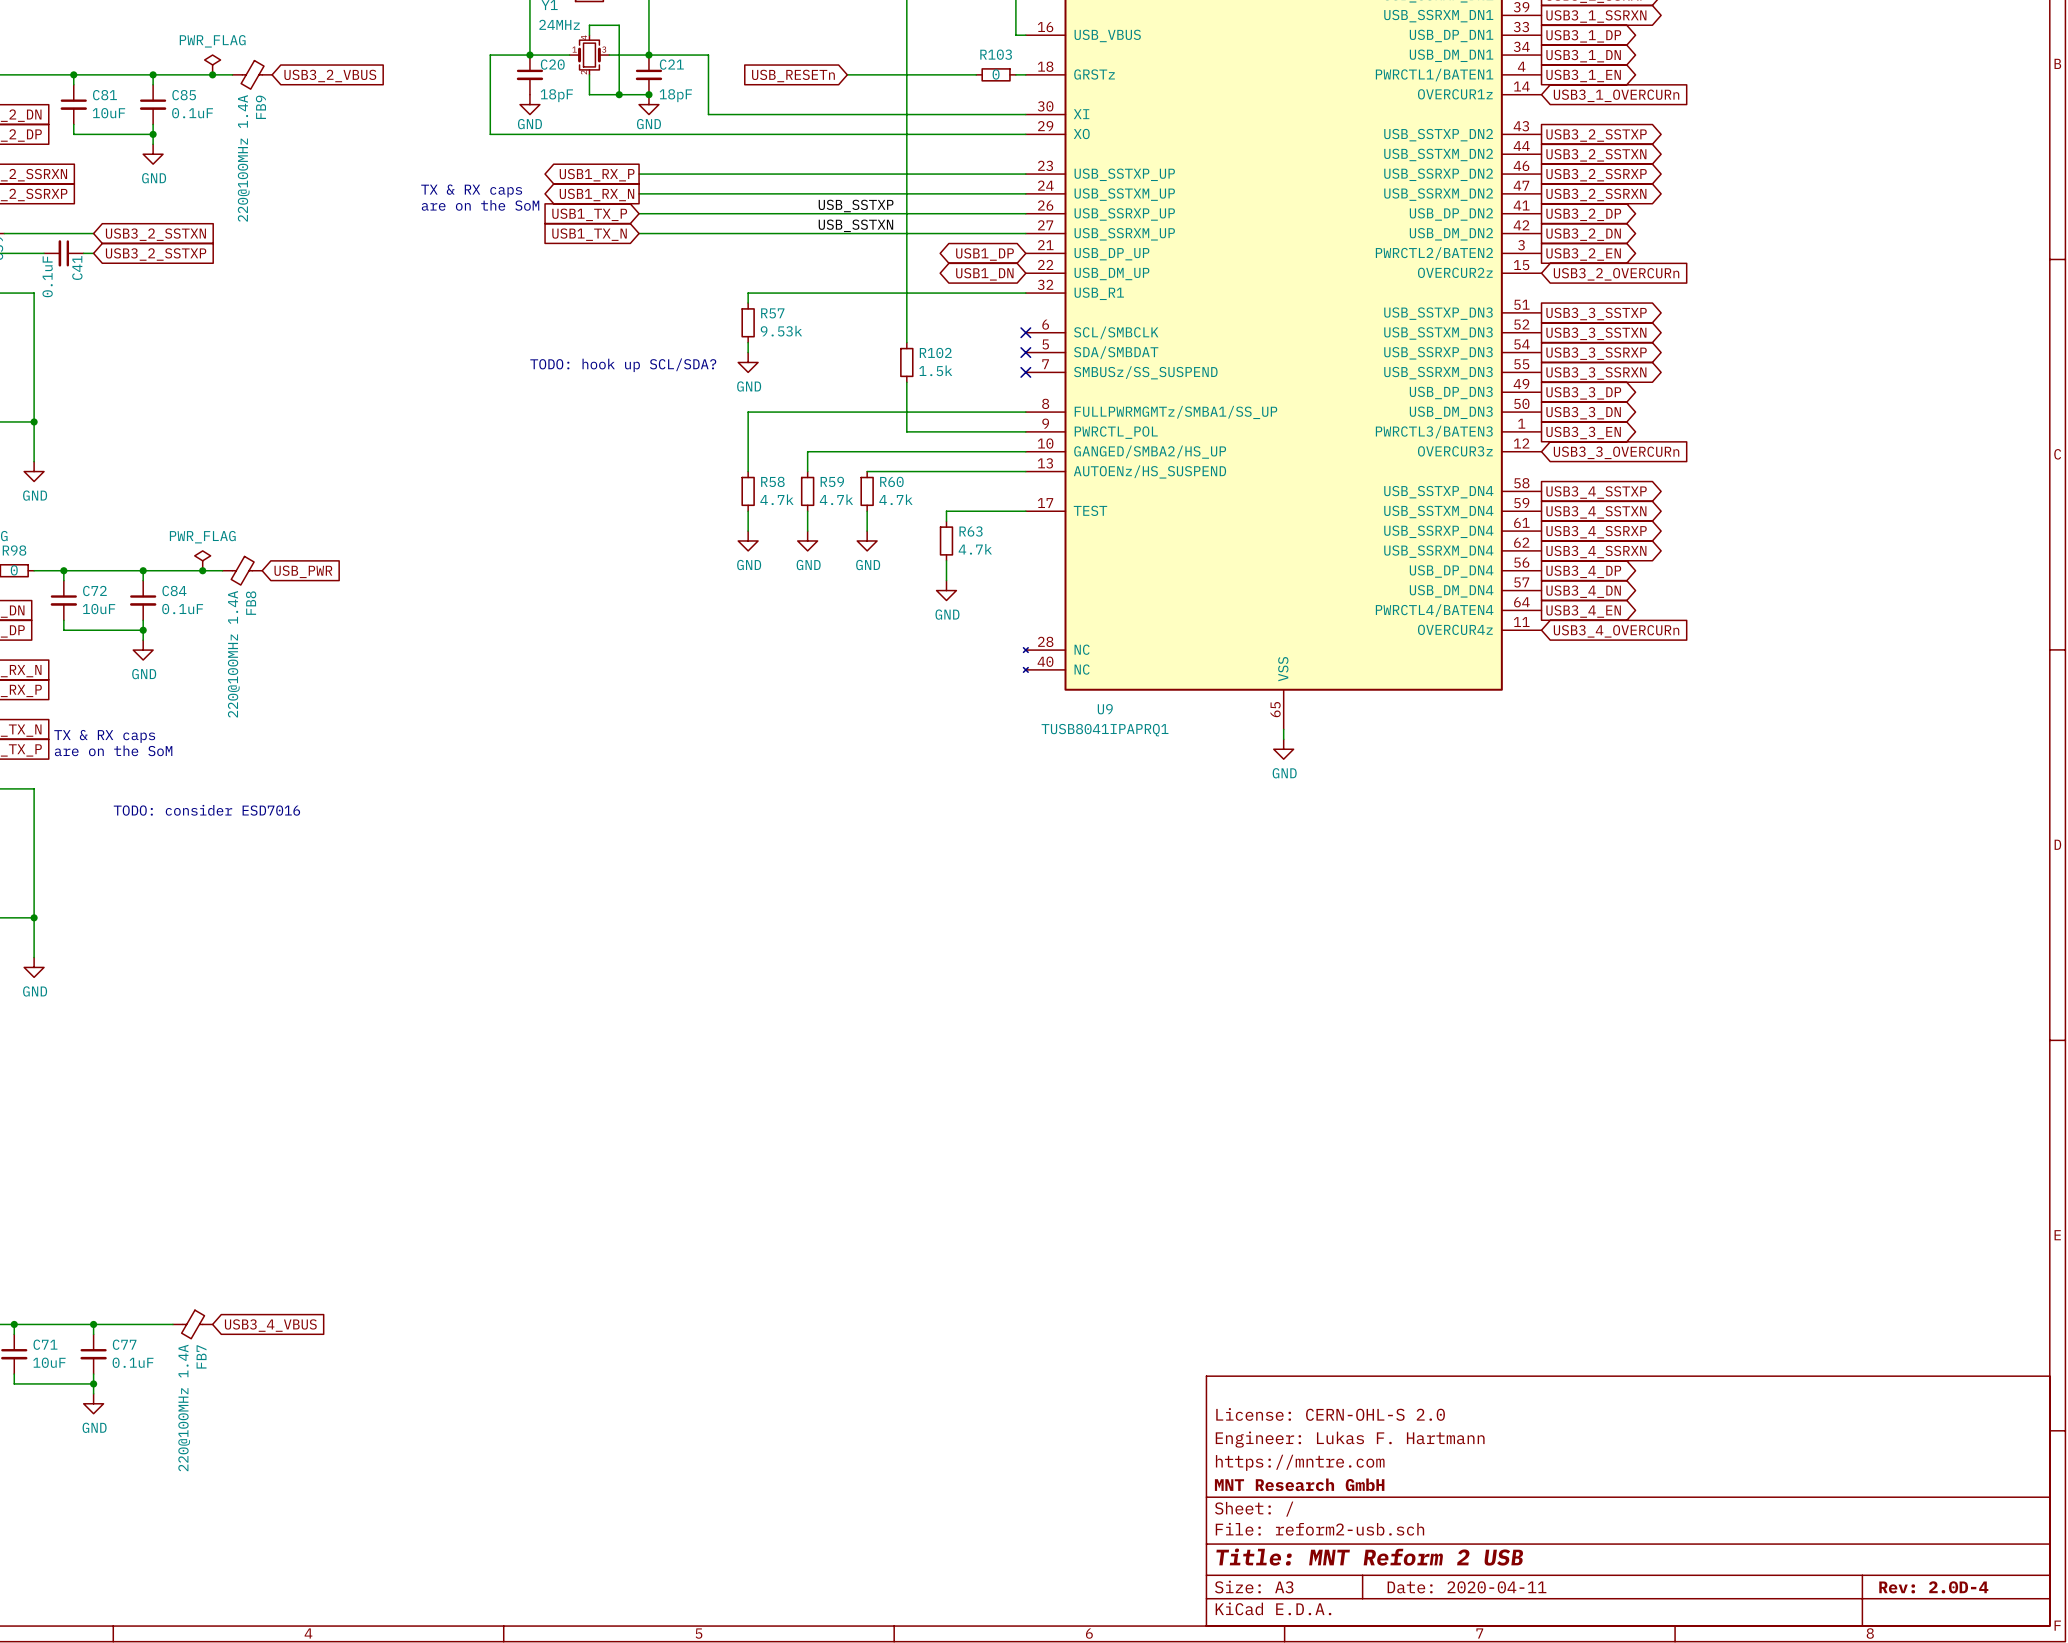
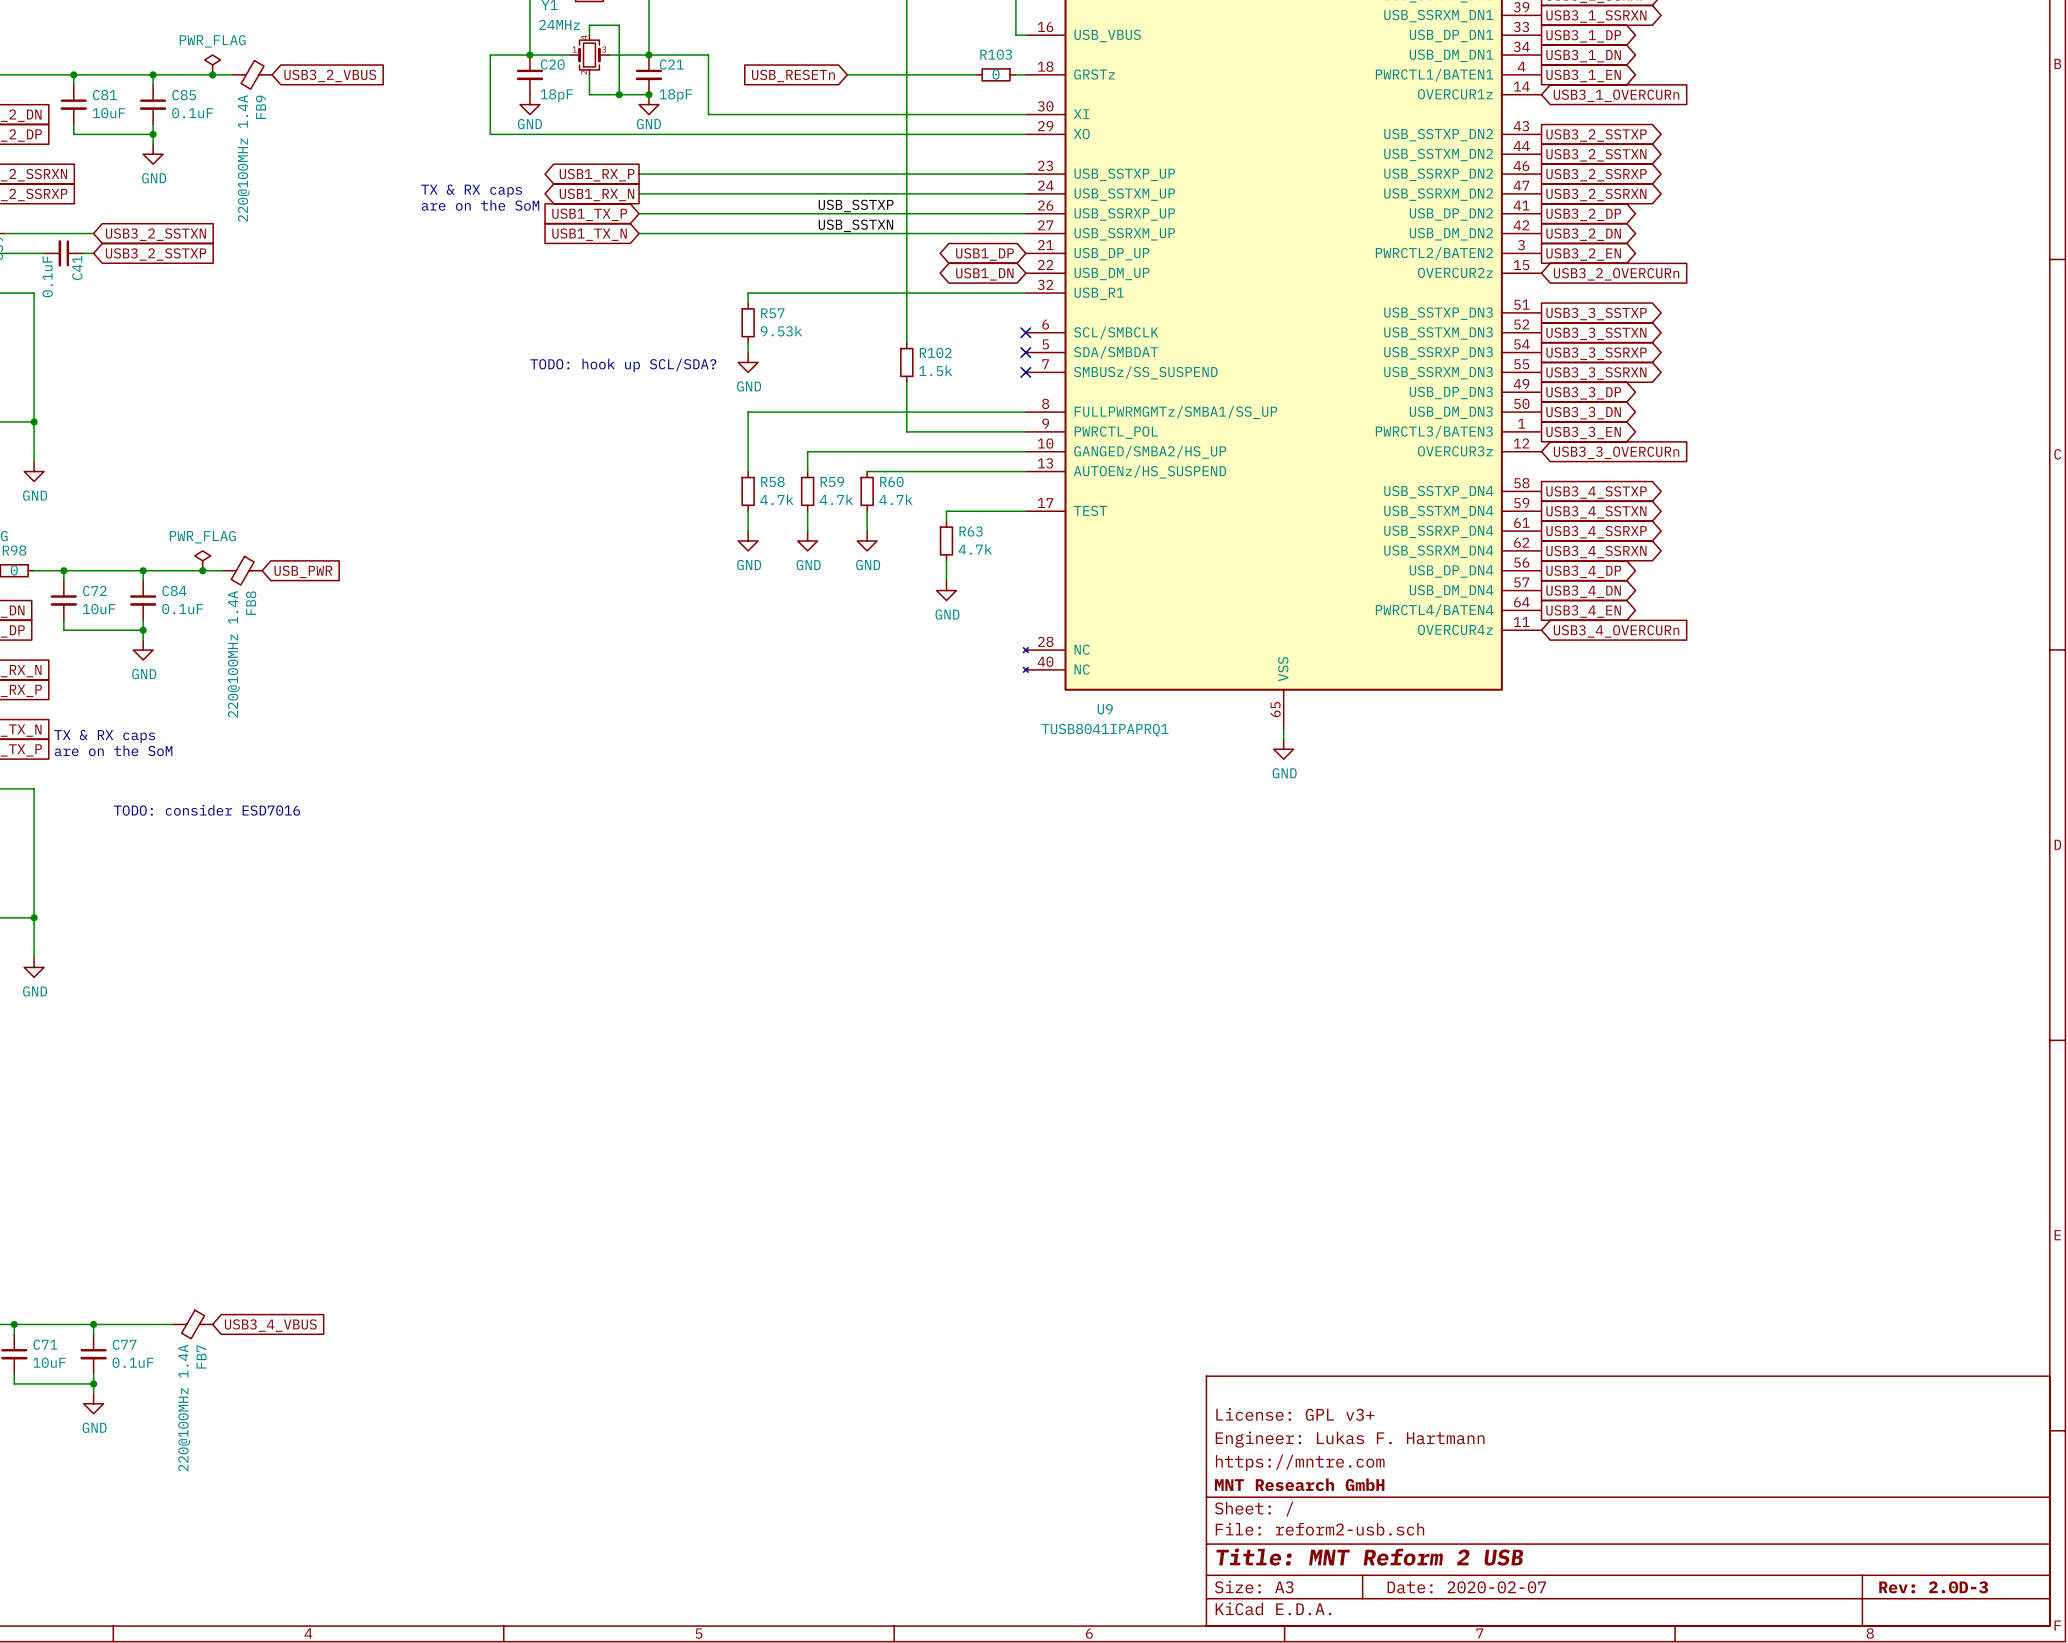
title block: License: CERN-OHL-S 2.0 (1330, 1414) -> License: GPL v3+ (1295, 1414)
title block: Date: 2020-04-11 (1467, 1587) -> Date: 2020-02-07 (1466, 1587)
title block: Rev: 2.0D-4 (1933, 1587) -> Rev: 2.0D-3 (1933, 1587)

